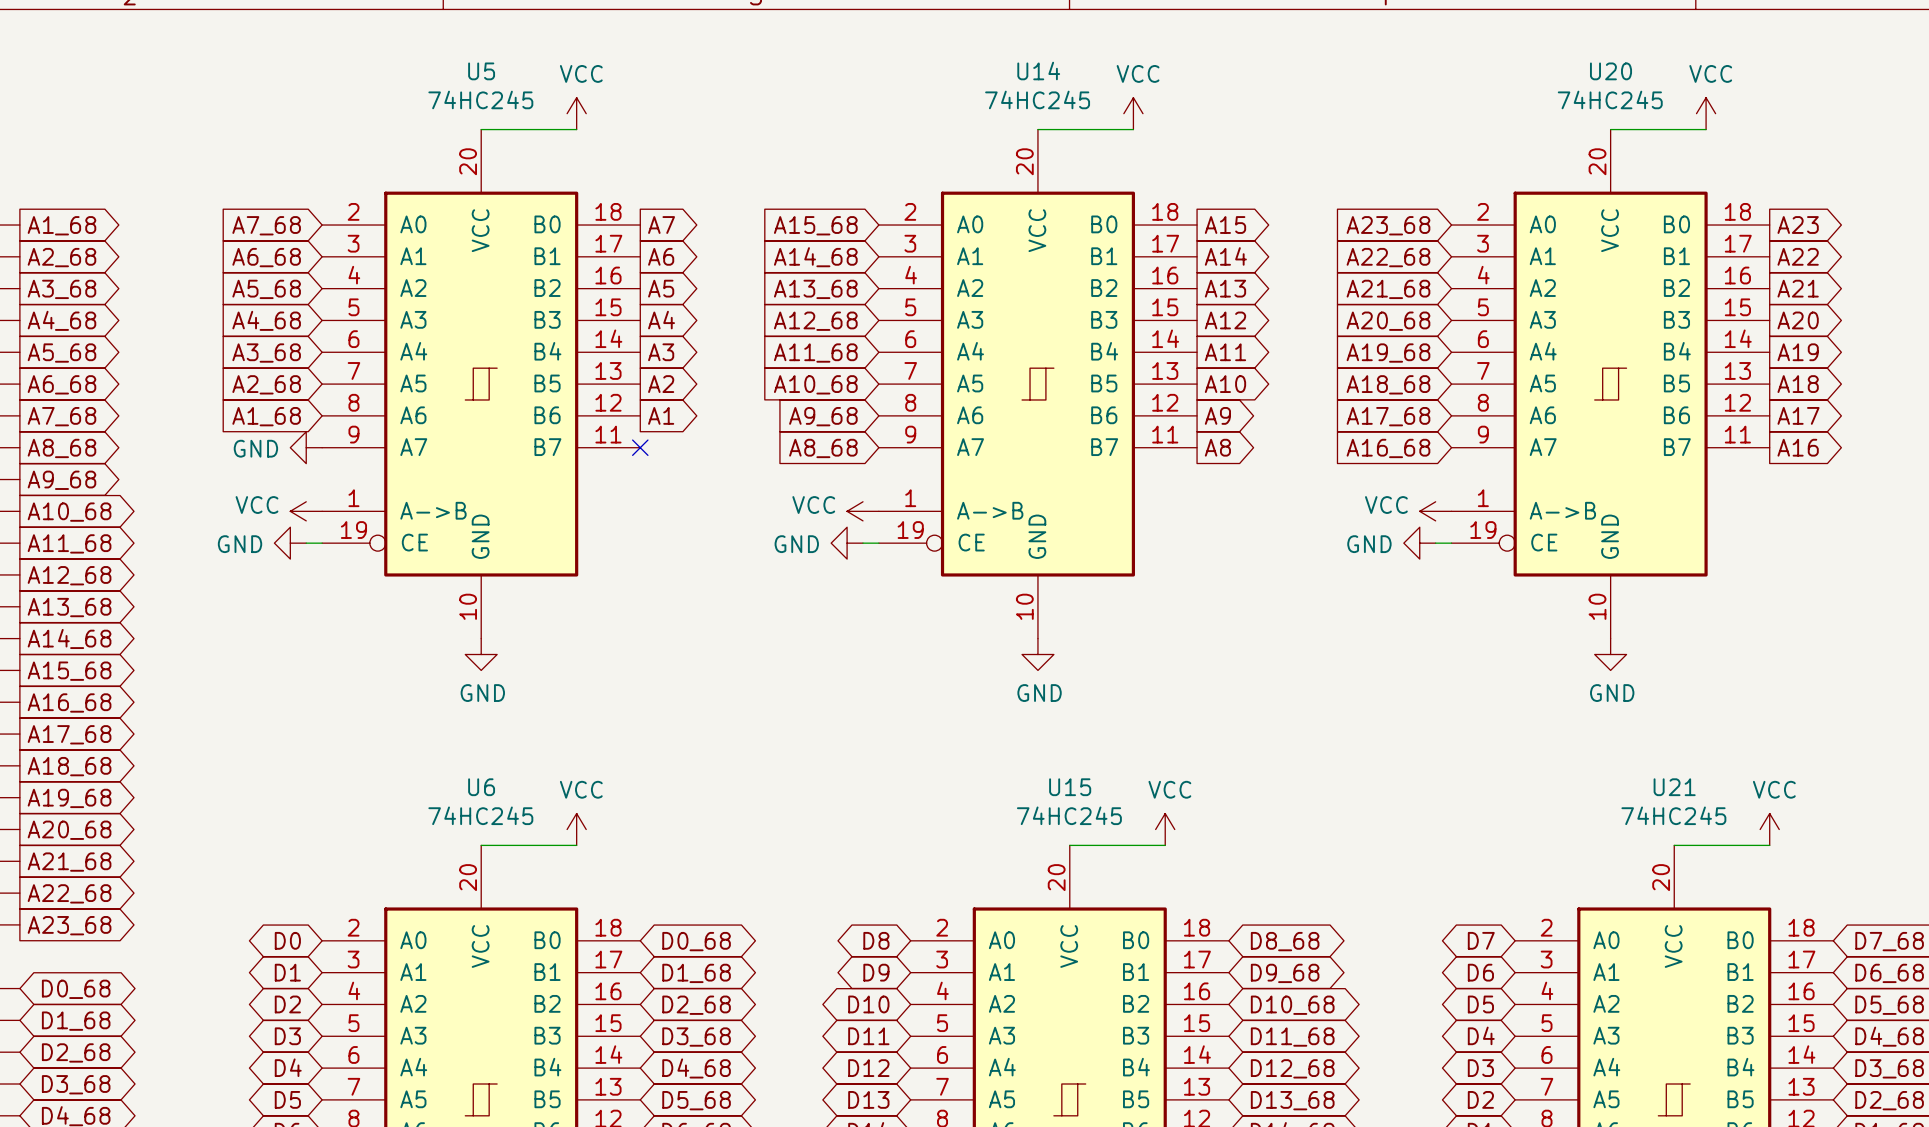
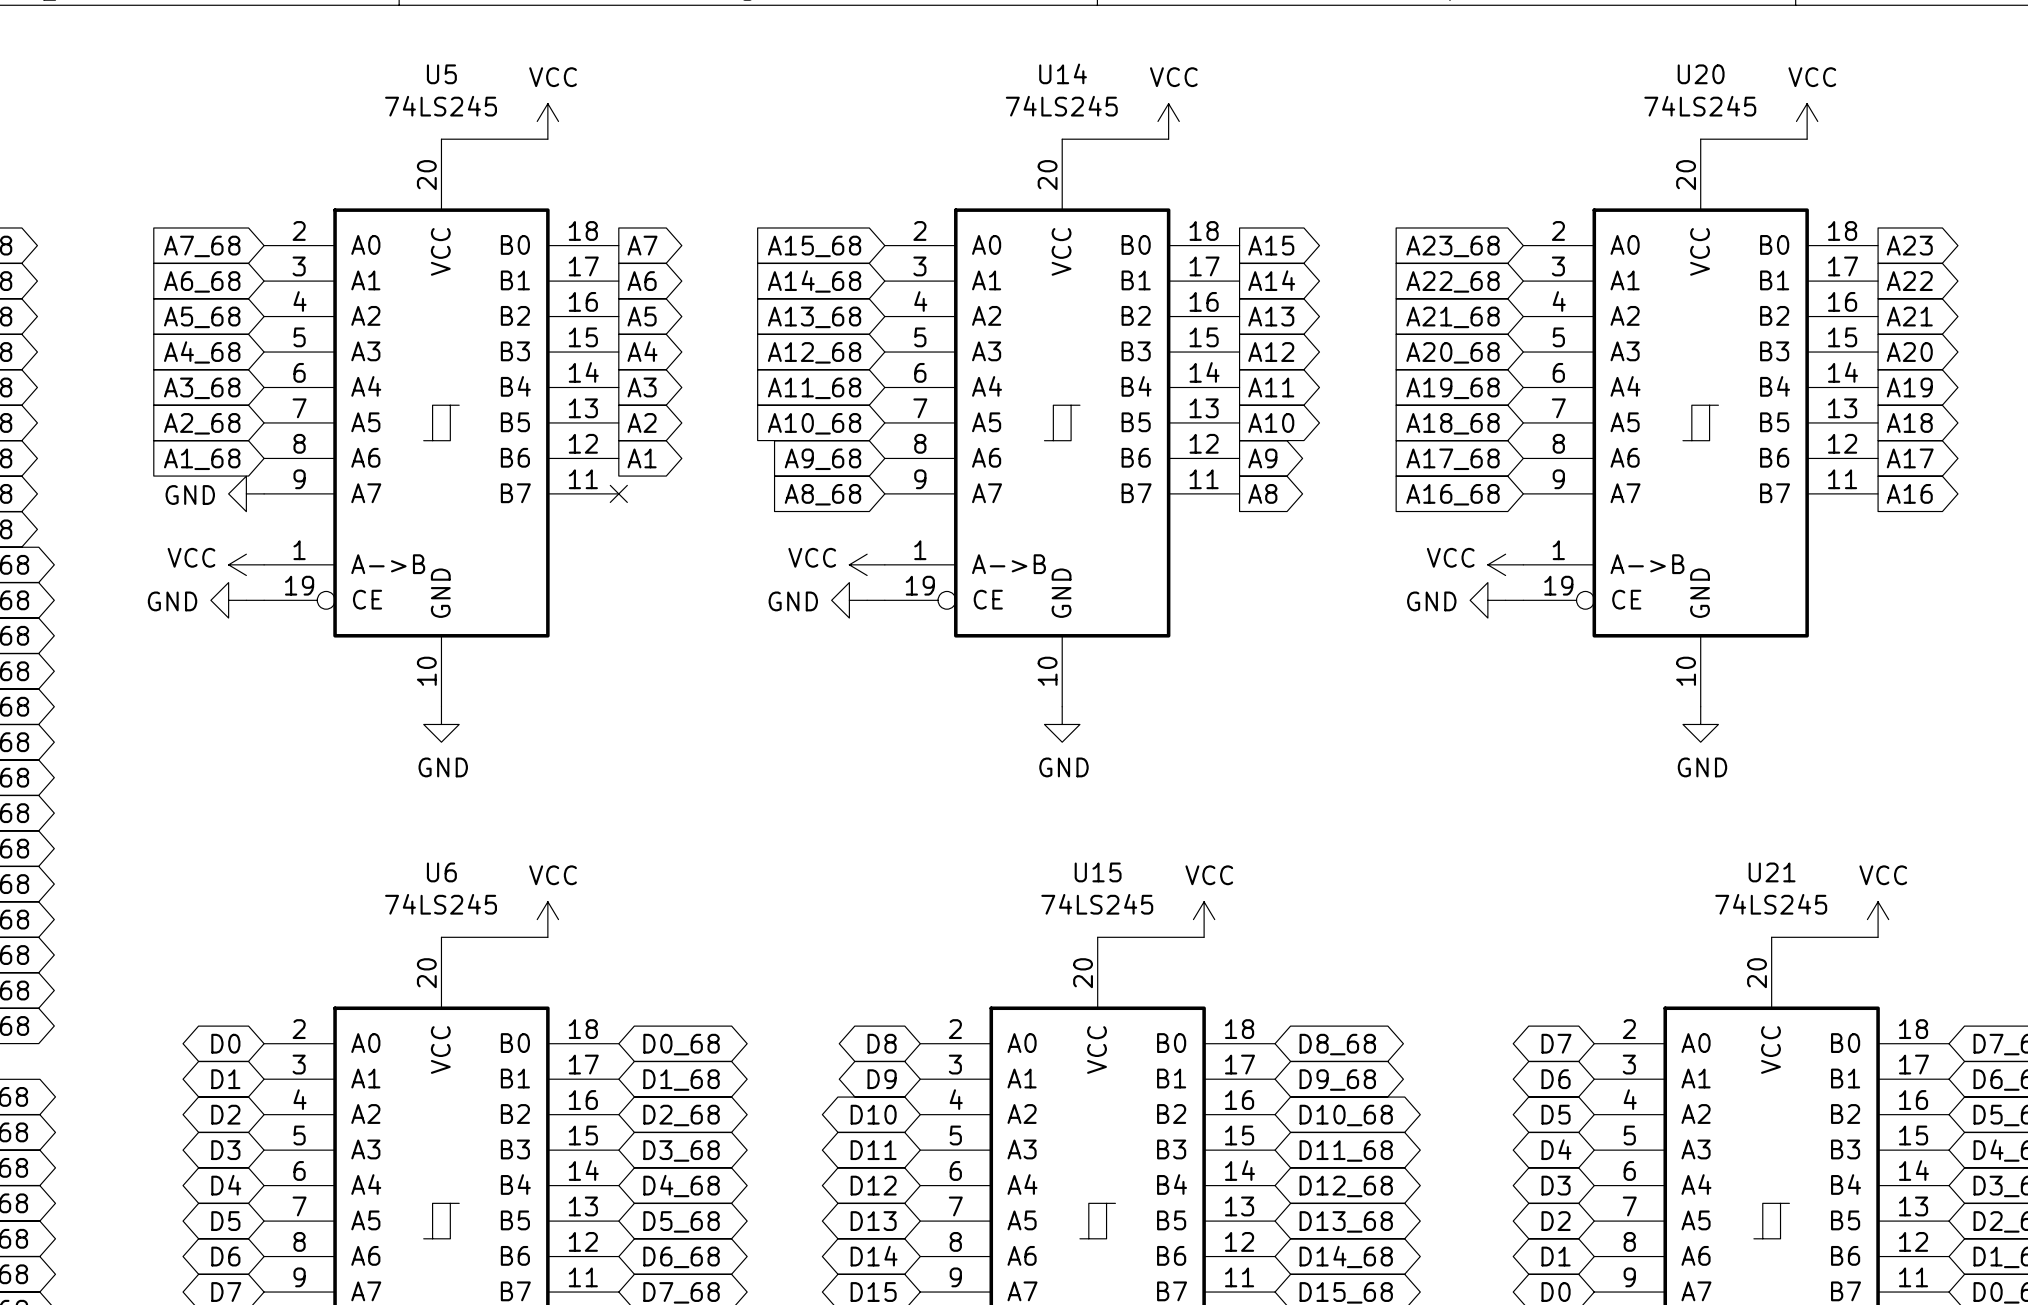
U5 value: 74HC245 (480, 99) -> 74LS245 (441, 106)
U14 value: 74HC245 (1037, 99) -> 74LS245 (1061, 106)
U20 value: 74HC245 (1610, 99) -> 74LS245 (1700, 106)
U6 value: 74HC245 (480, 815) -> 74LS245 (441, 904)
U15 value: 74HC245 (1069, 815) -> 74LS245 (1097, 904)
U21 value: 74HC245 (1673, 815) -> 74LS245 (1771, 904)

